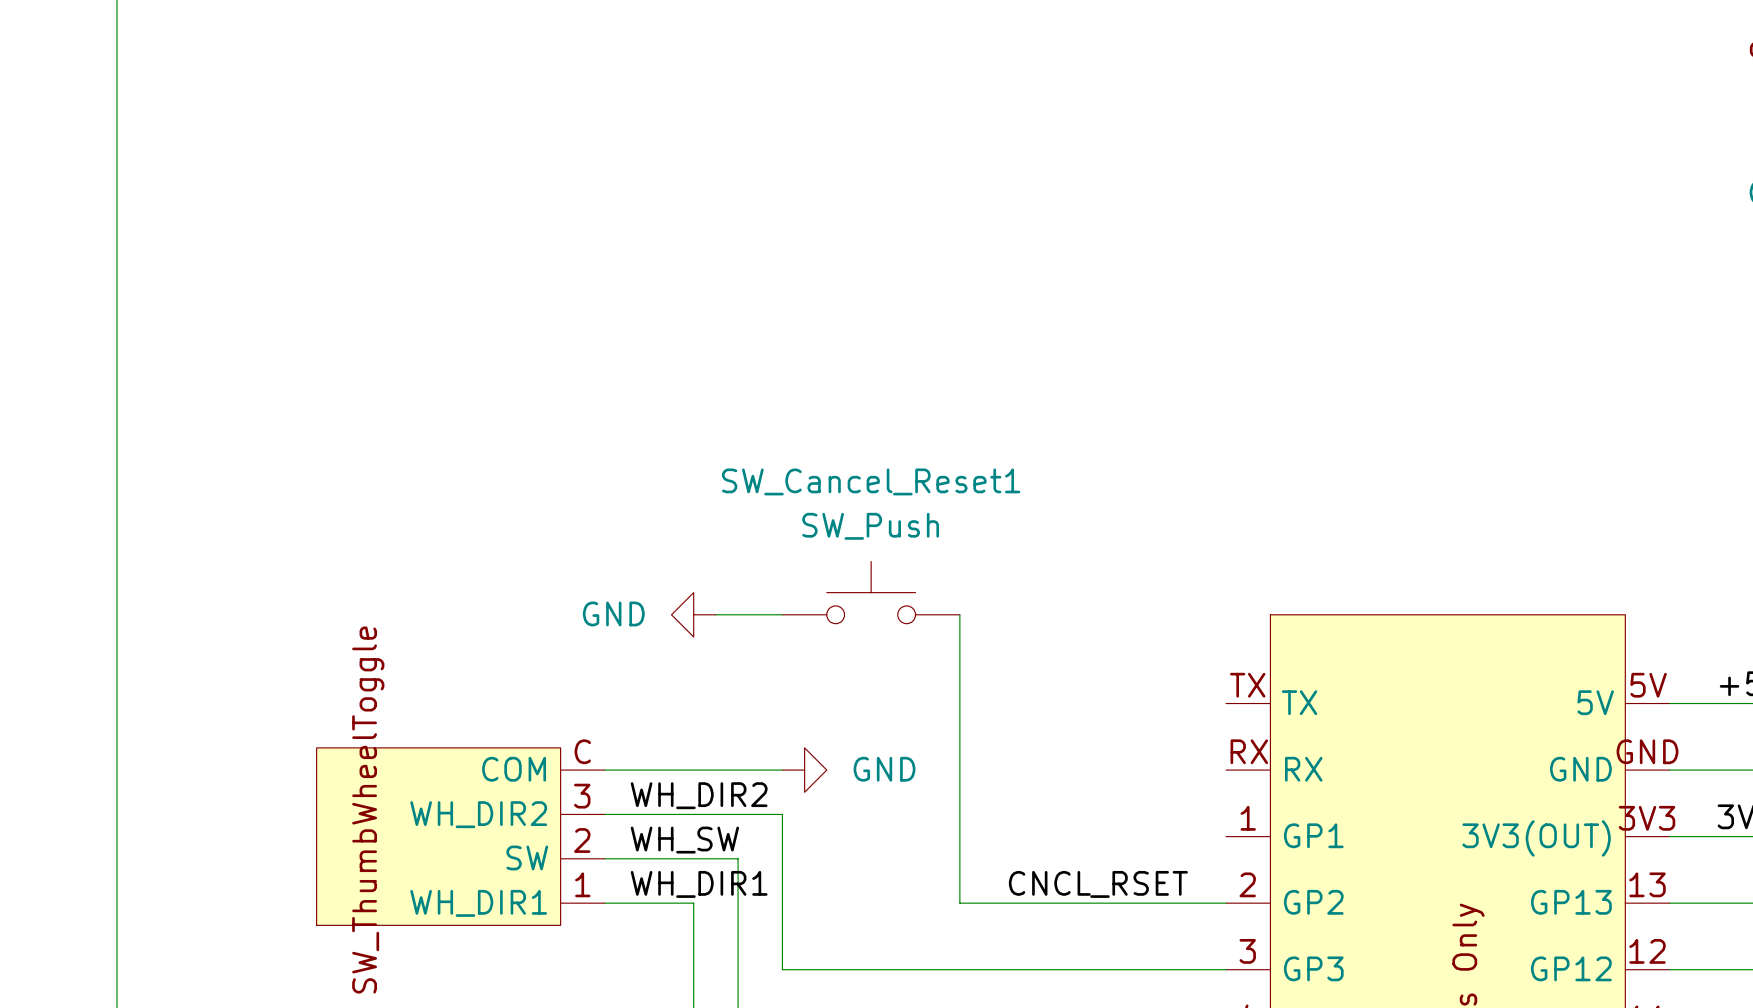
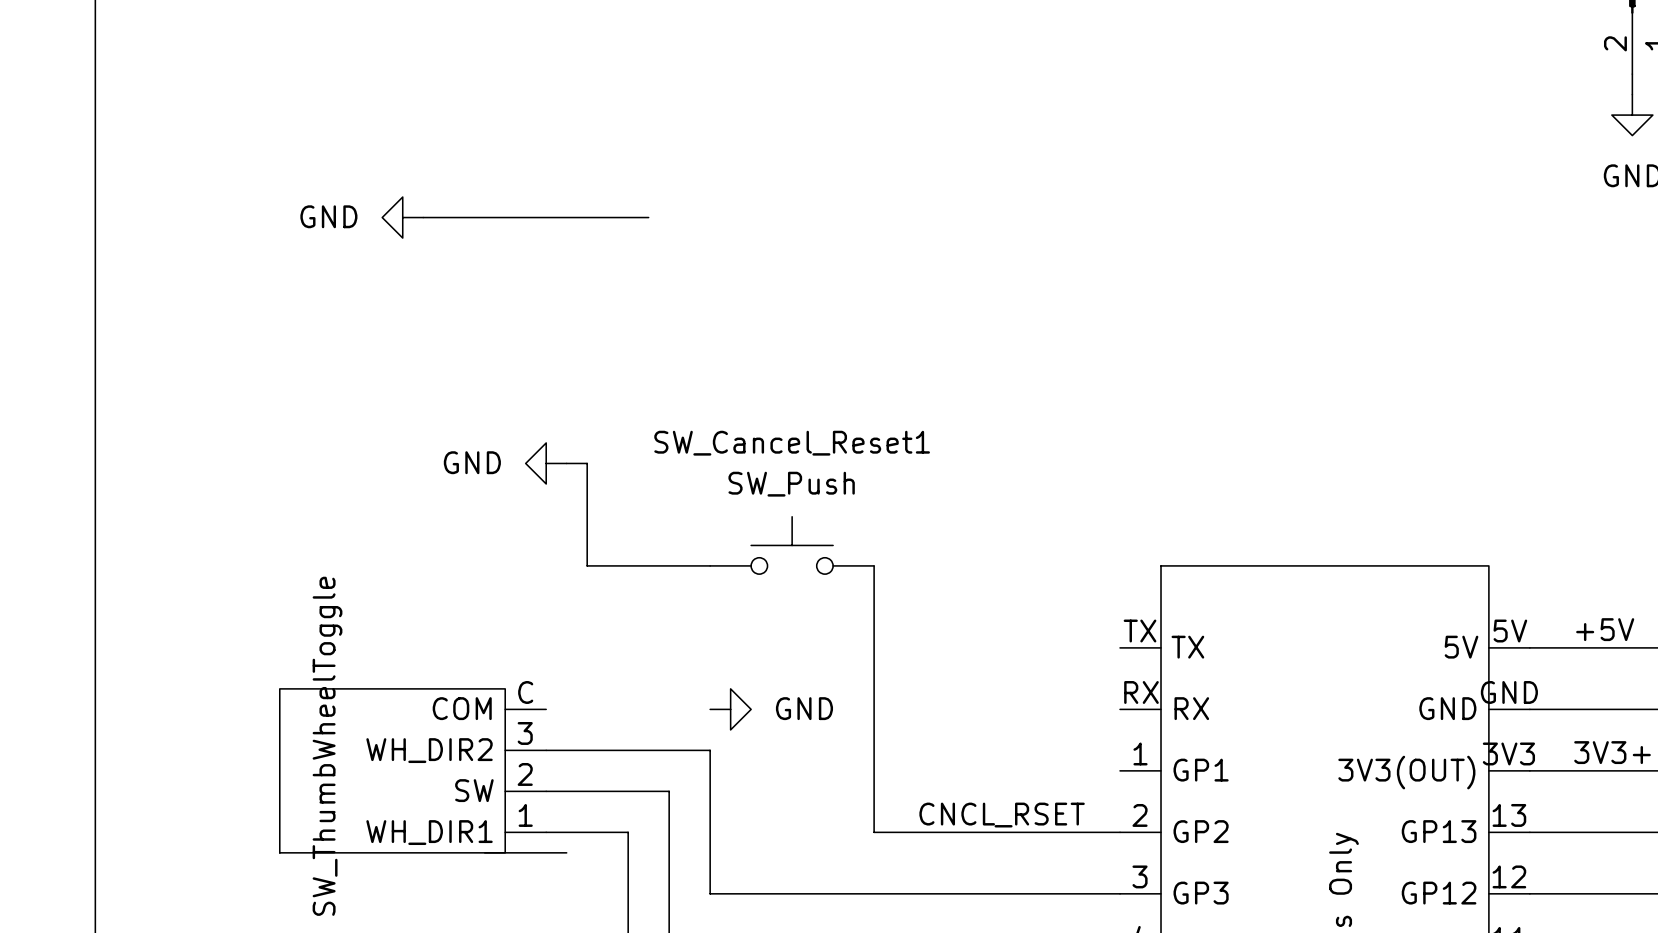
power symbol: none -> GND (402, 217)
wire: none -> (423, 217) (648, 217)
wire: none -> (566, 463) (587, 463) (587, 565) (648, 565)
power symbol position: GND (693, 614) -> GND (546, 463)
wire: (604, 770) (782, 770) -> none
label: WH_DIR2 (699, 795) -> none
label: WH_SW (684, 840) -> none
label: WH_DIR1 (699, 884) -> none
wire: none -> (484, 852) (566, 852)

